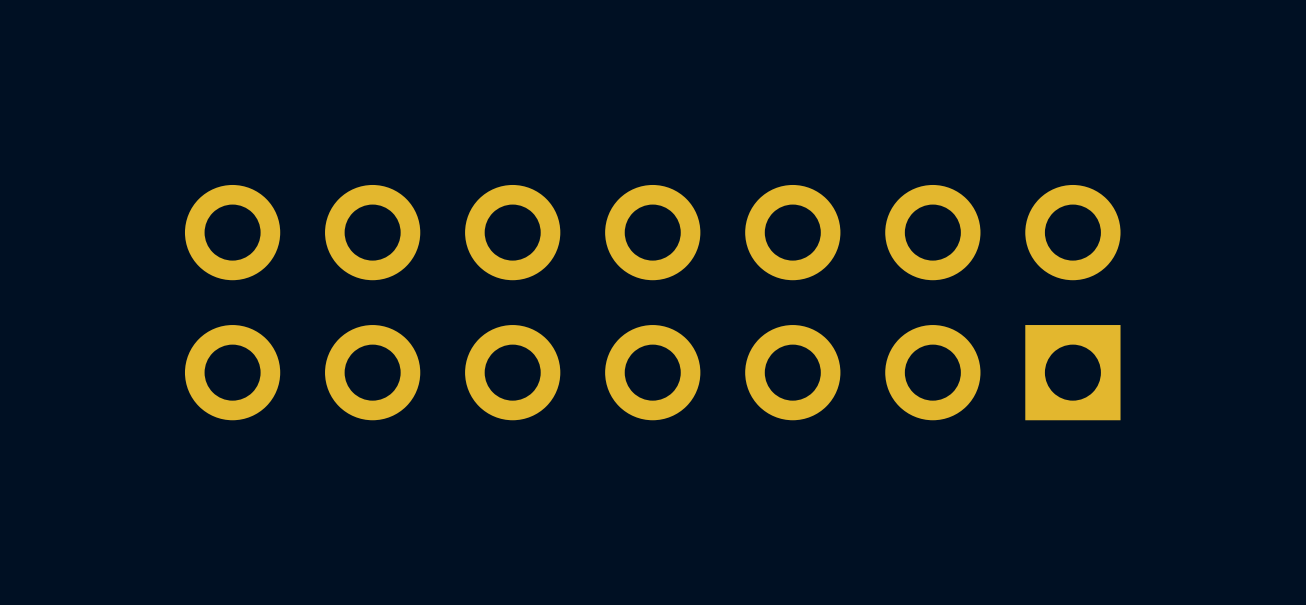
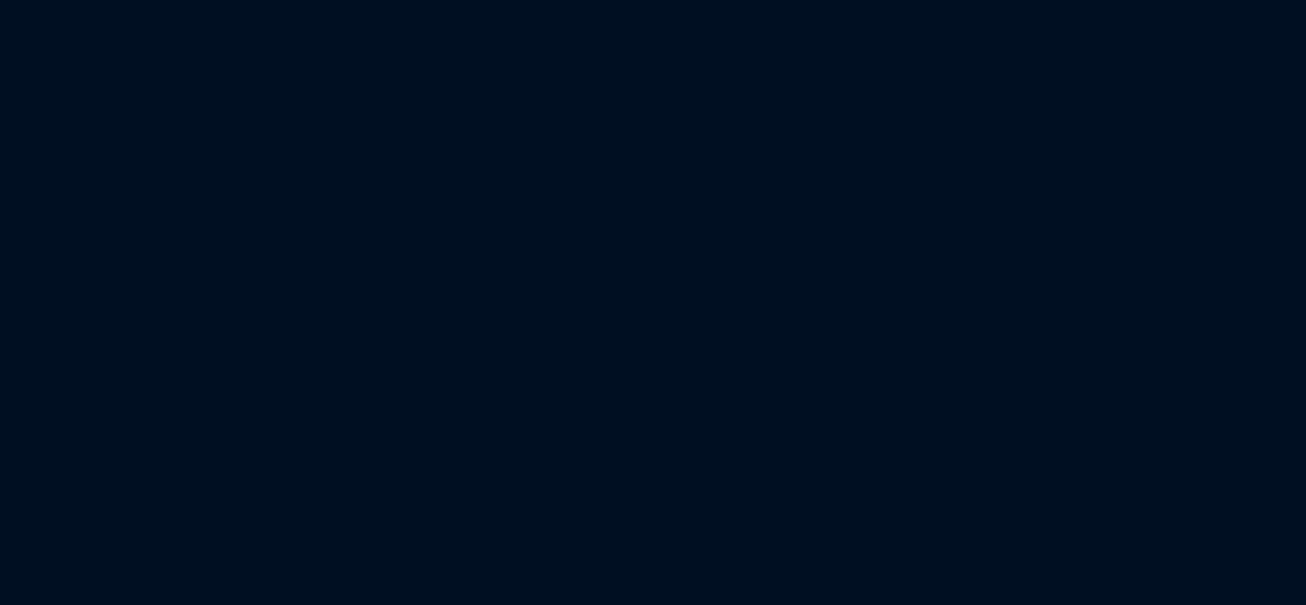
part: (652, 302) -> none

